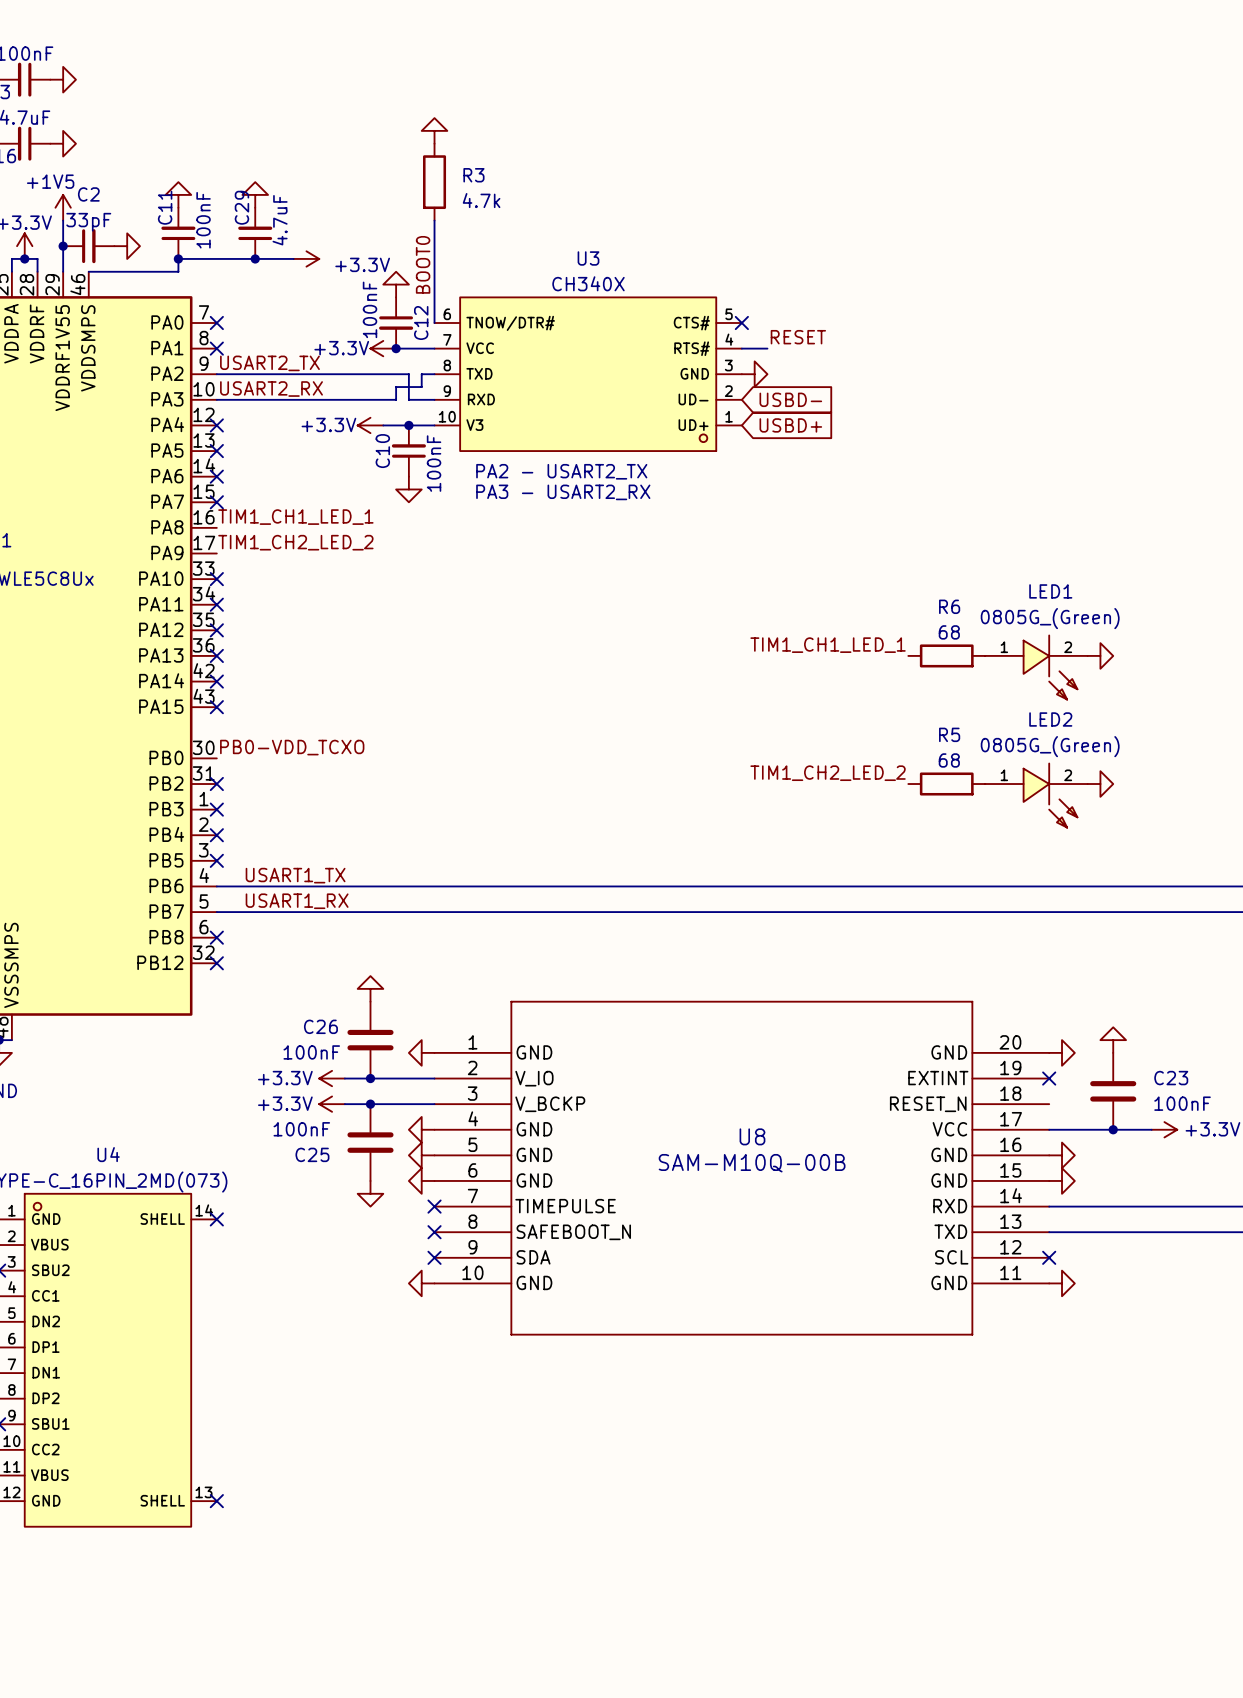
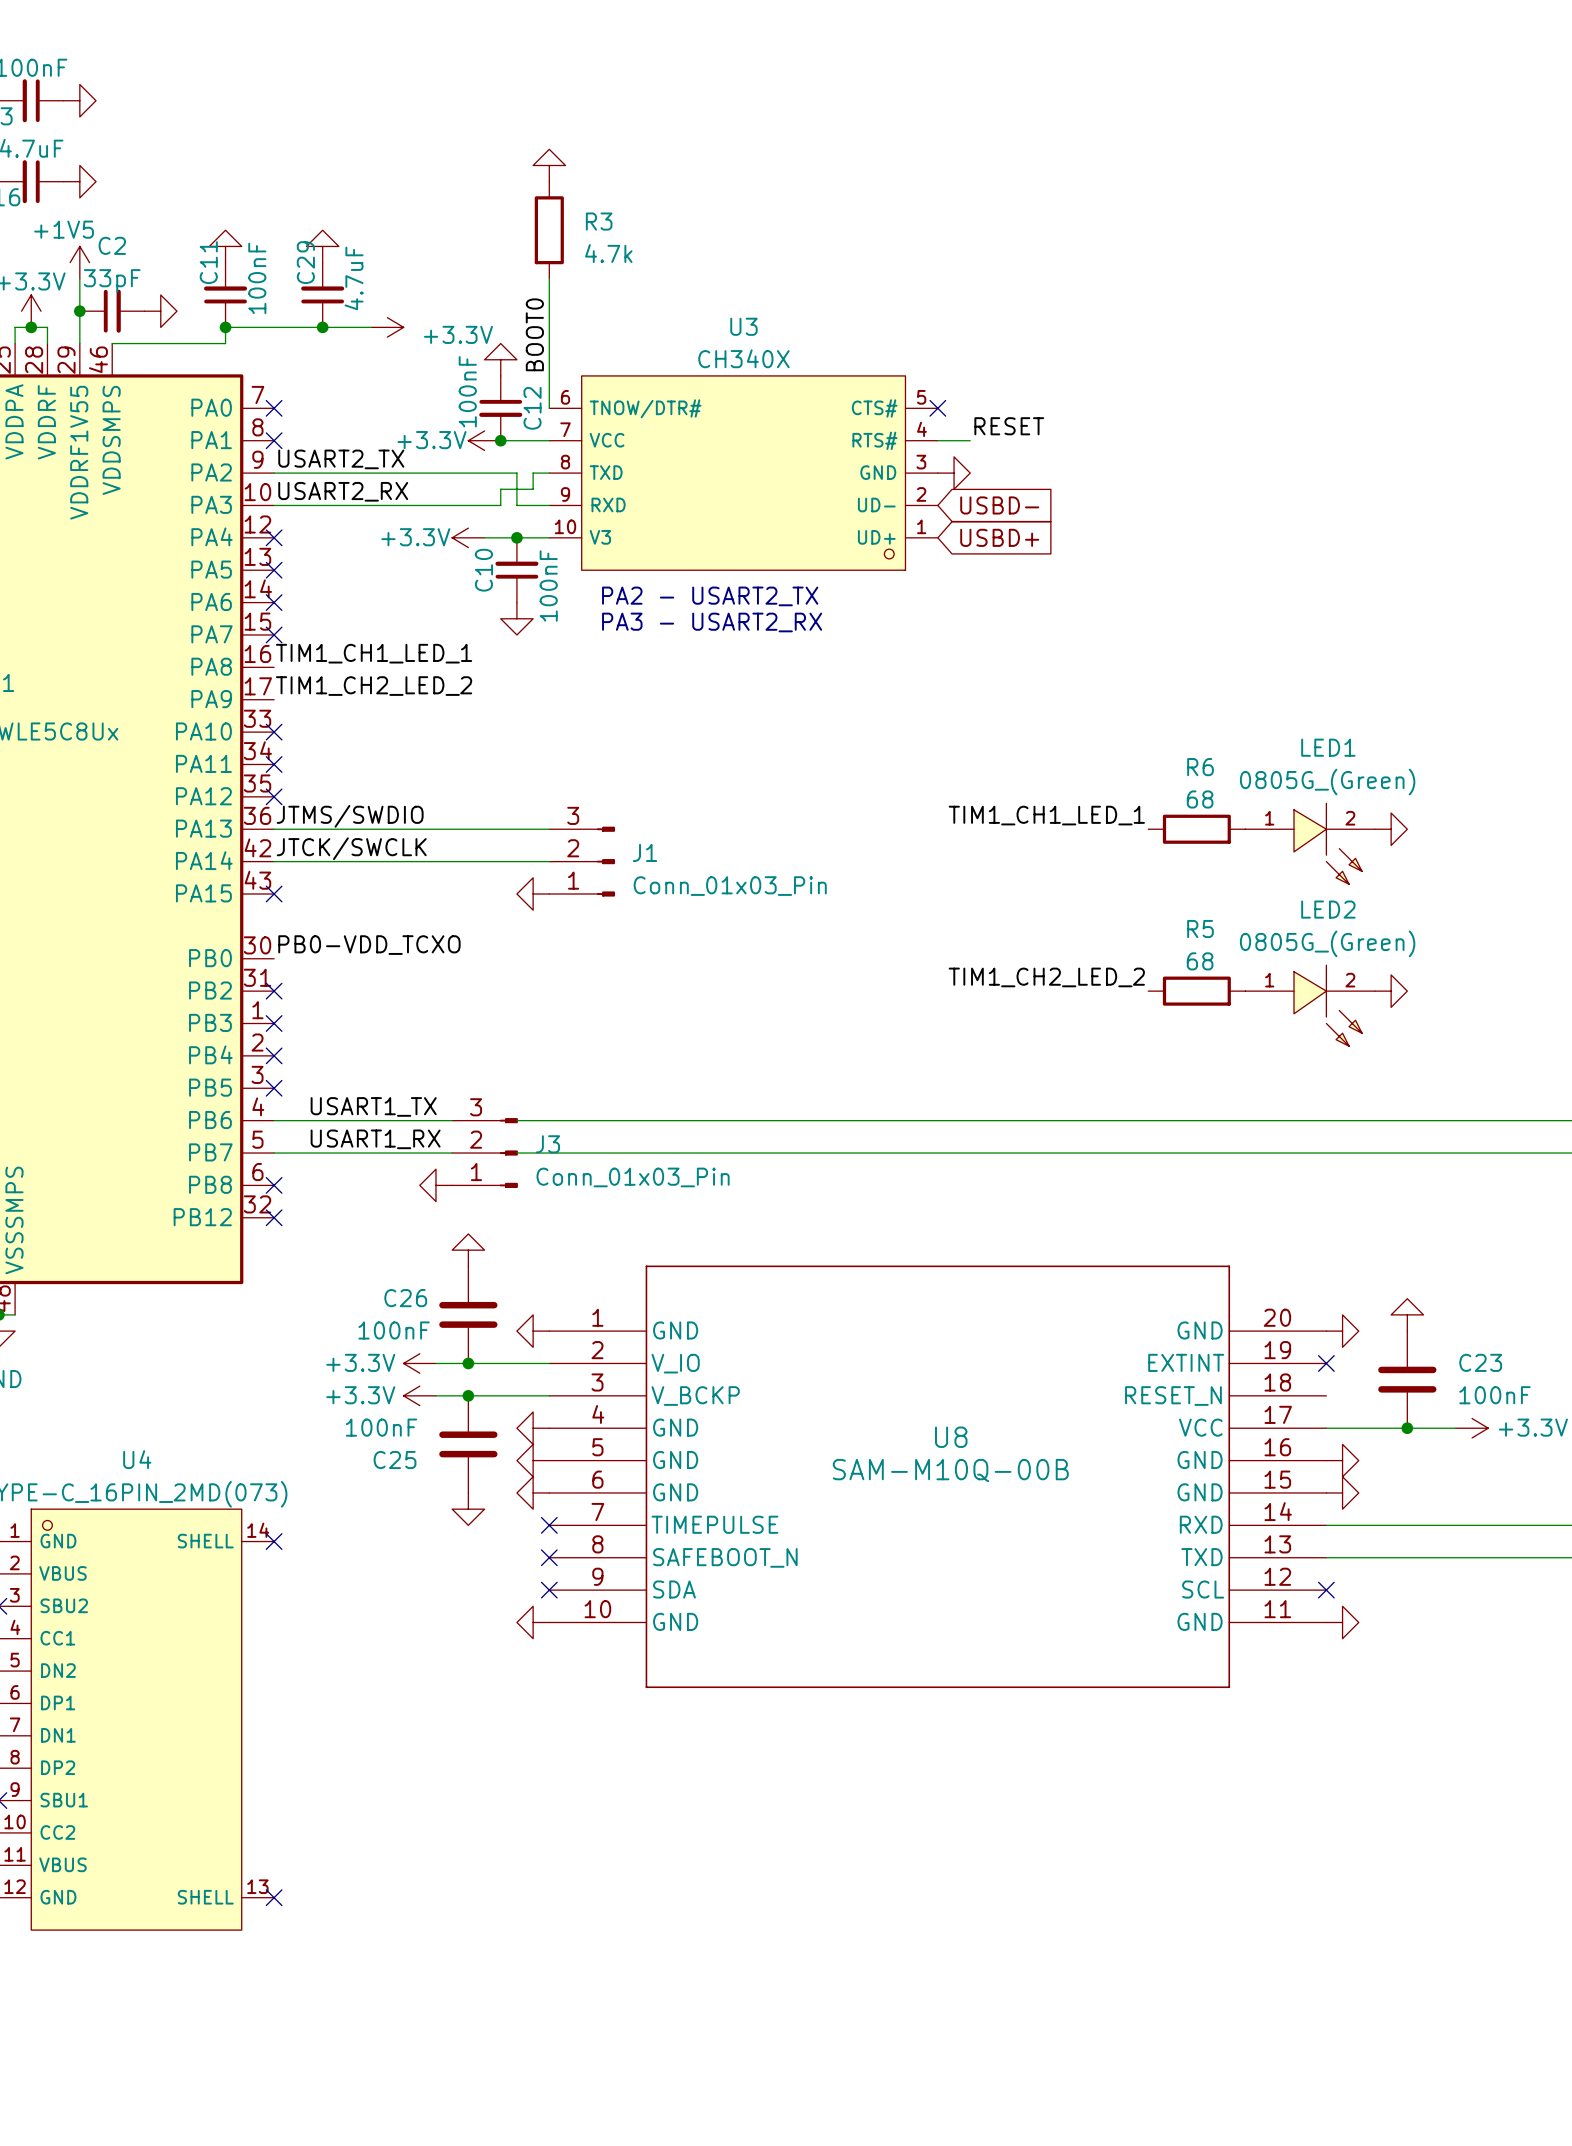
label: none -> JTMS/SWDIO (350, 816)
wire: none -> (274, 829) (549, 829)
no-connect mark: (216, 655) -> none
label: none -> JTCK/SWCLK (351, 848)
wire: none -> (274, 861) (549, 861)
no-connect mark: (216, 681) -> none
J1: none -> Conn_01x03_Pin (582, 861)
power symbol: none -> (533, 893)
J3: none -> Conn_01x03_Pin (485, 1153)
power symbol: none -> (435, 1185)

